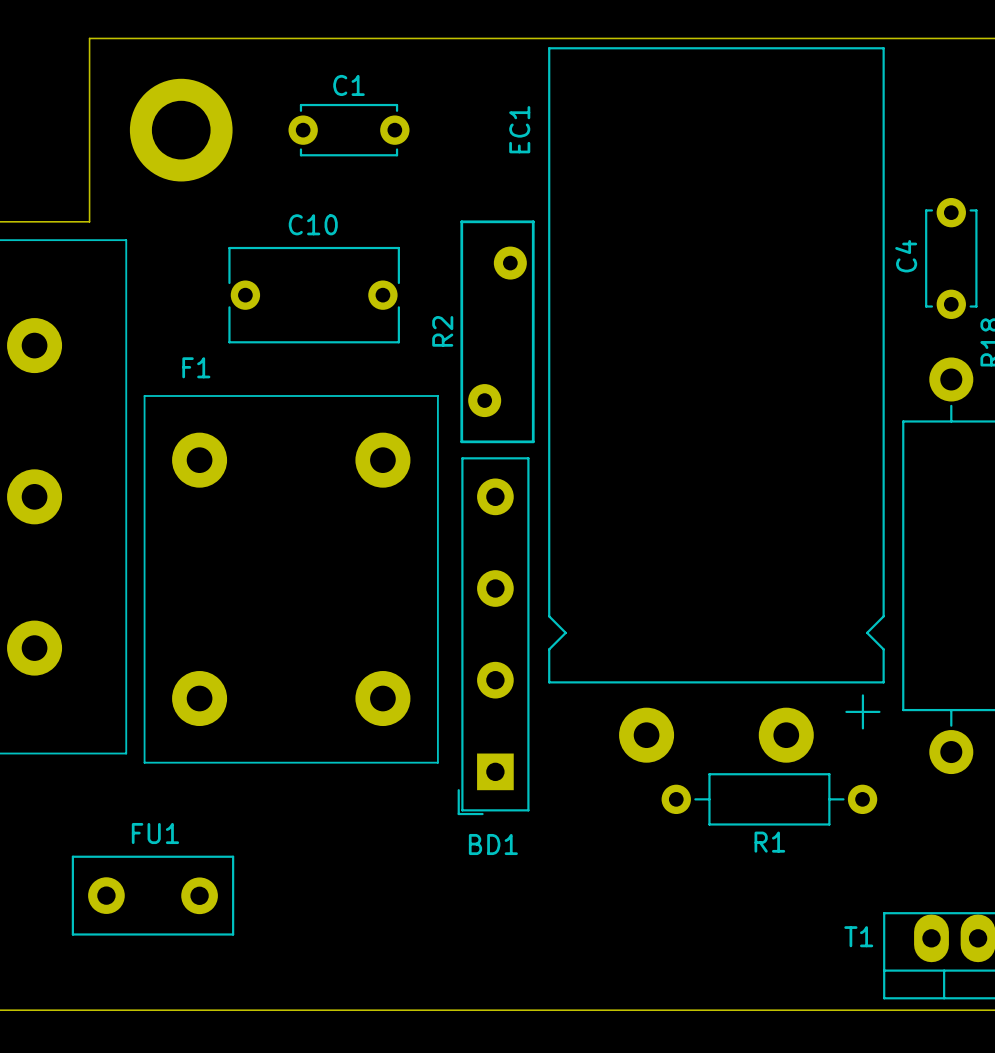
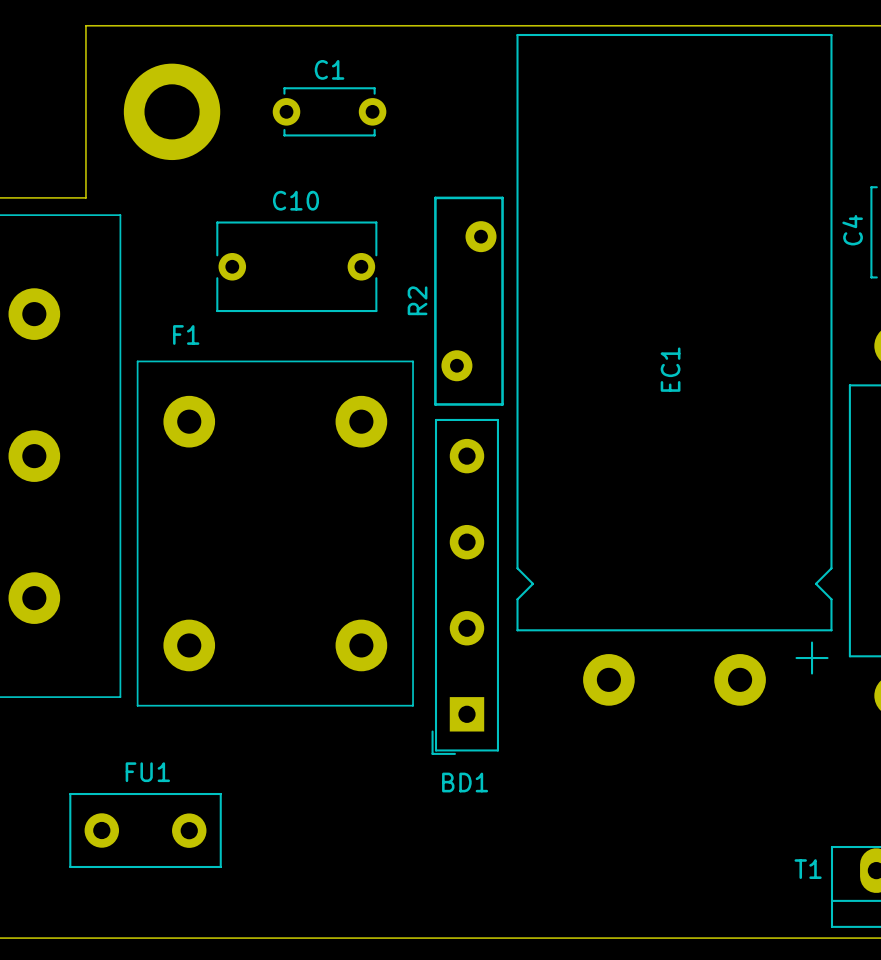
EC1 name position: EC1 (519, 129) -> EC1 (670, 369)
R1: (769, 799) -> none

